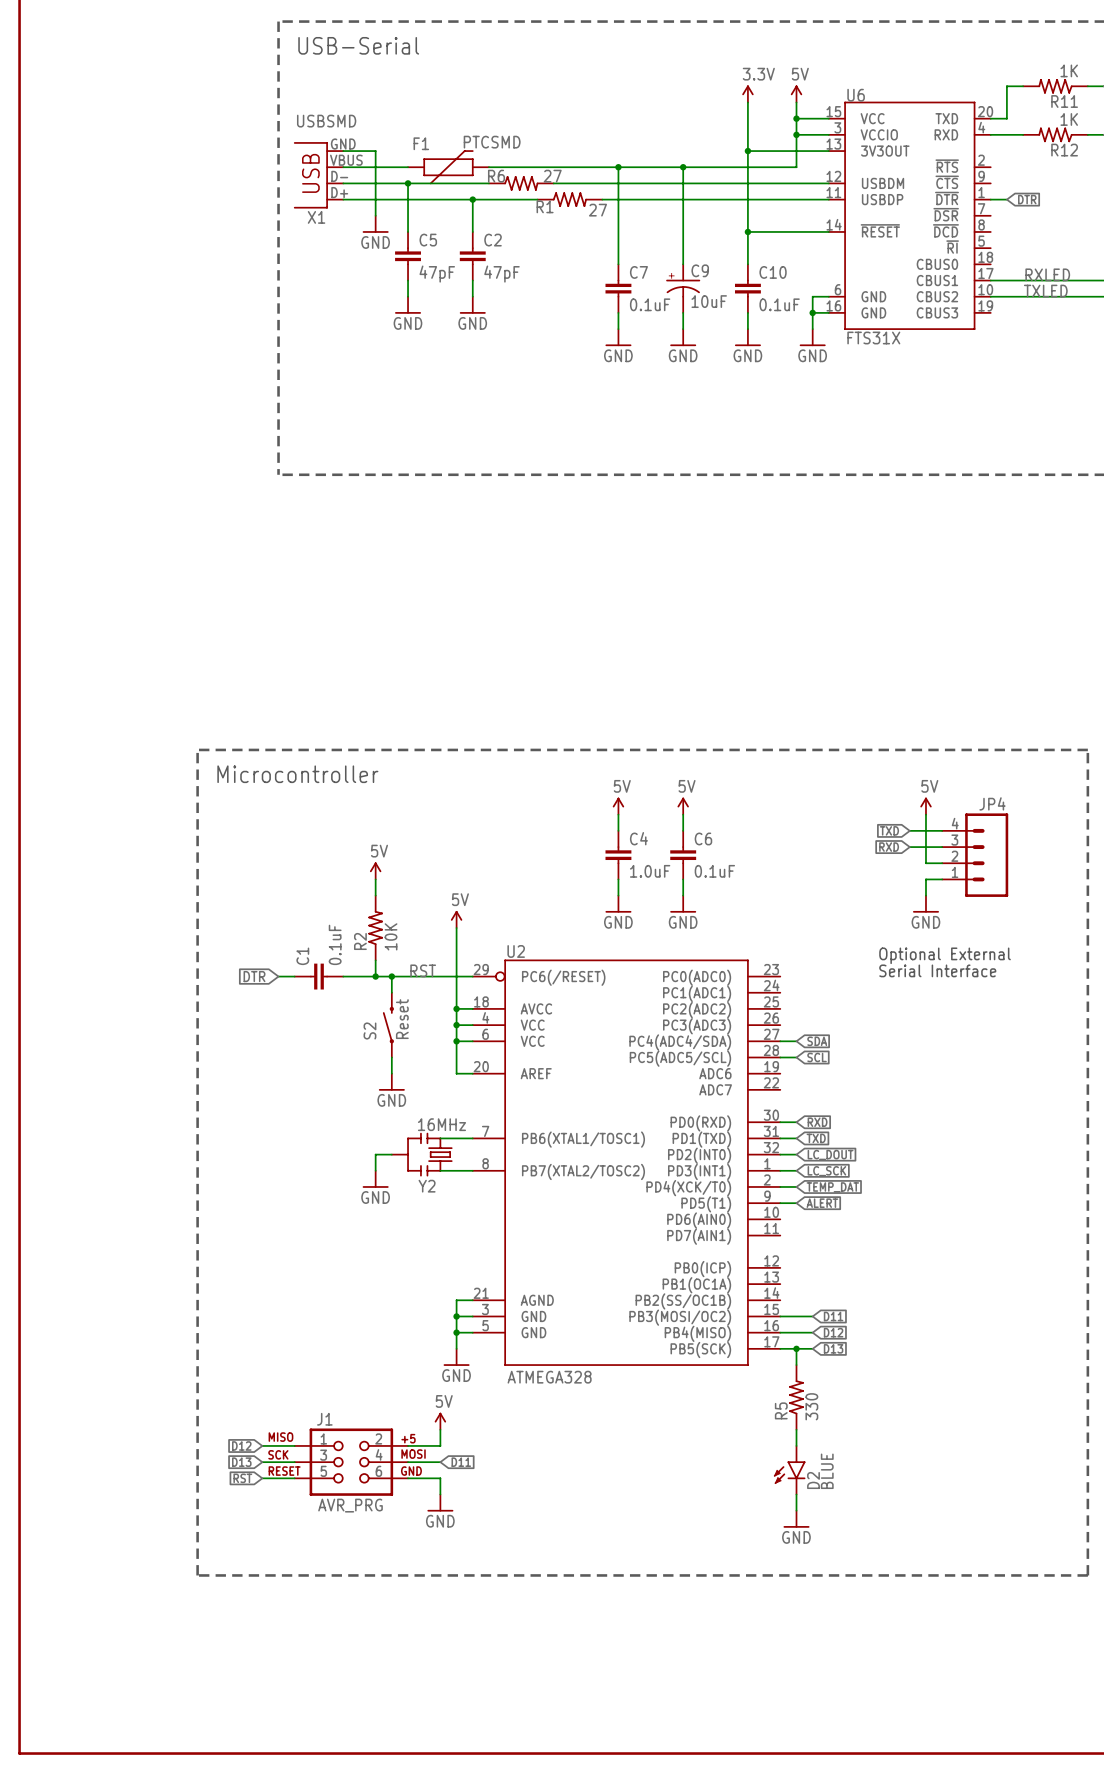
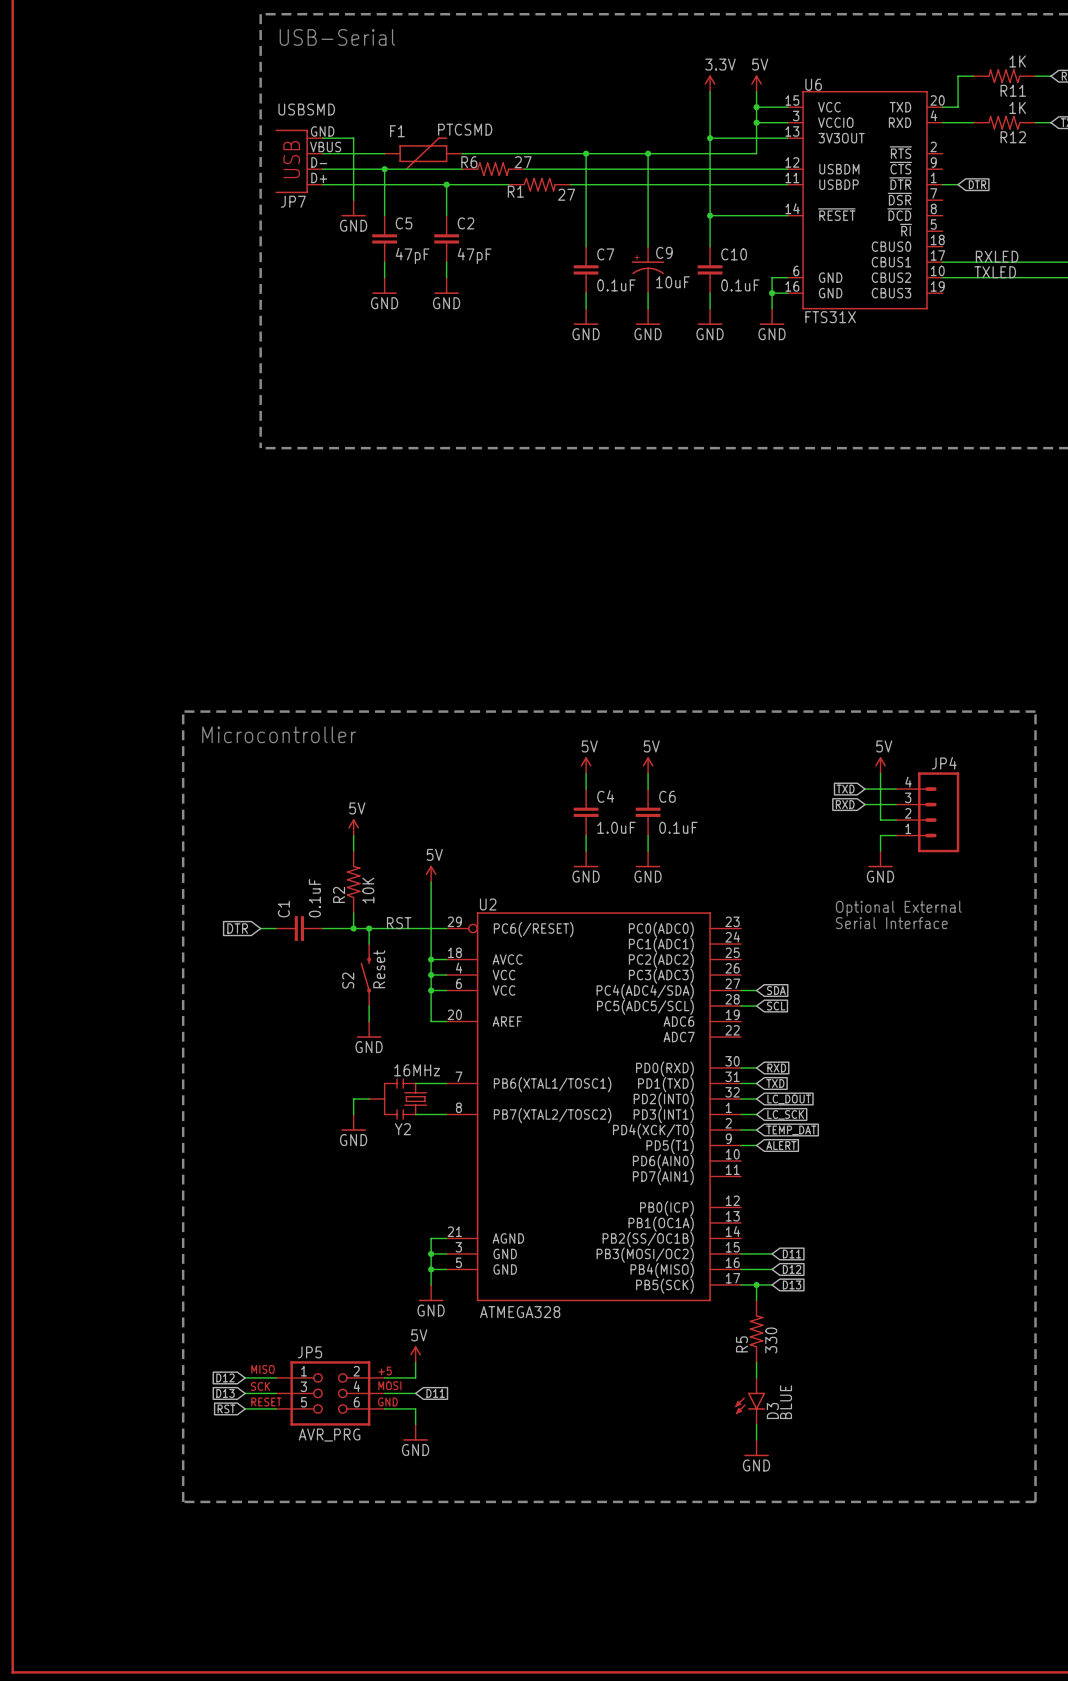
X1 name: X1 (316, 217) -> JP7 (293, 201)
J1 name: J1 (324, 1419) -> JP5 (309, 1352)
D2 name: D2 (813, 1480) -> D3 (772, 1411)

